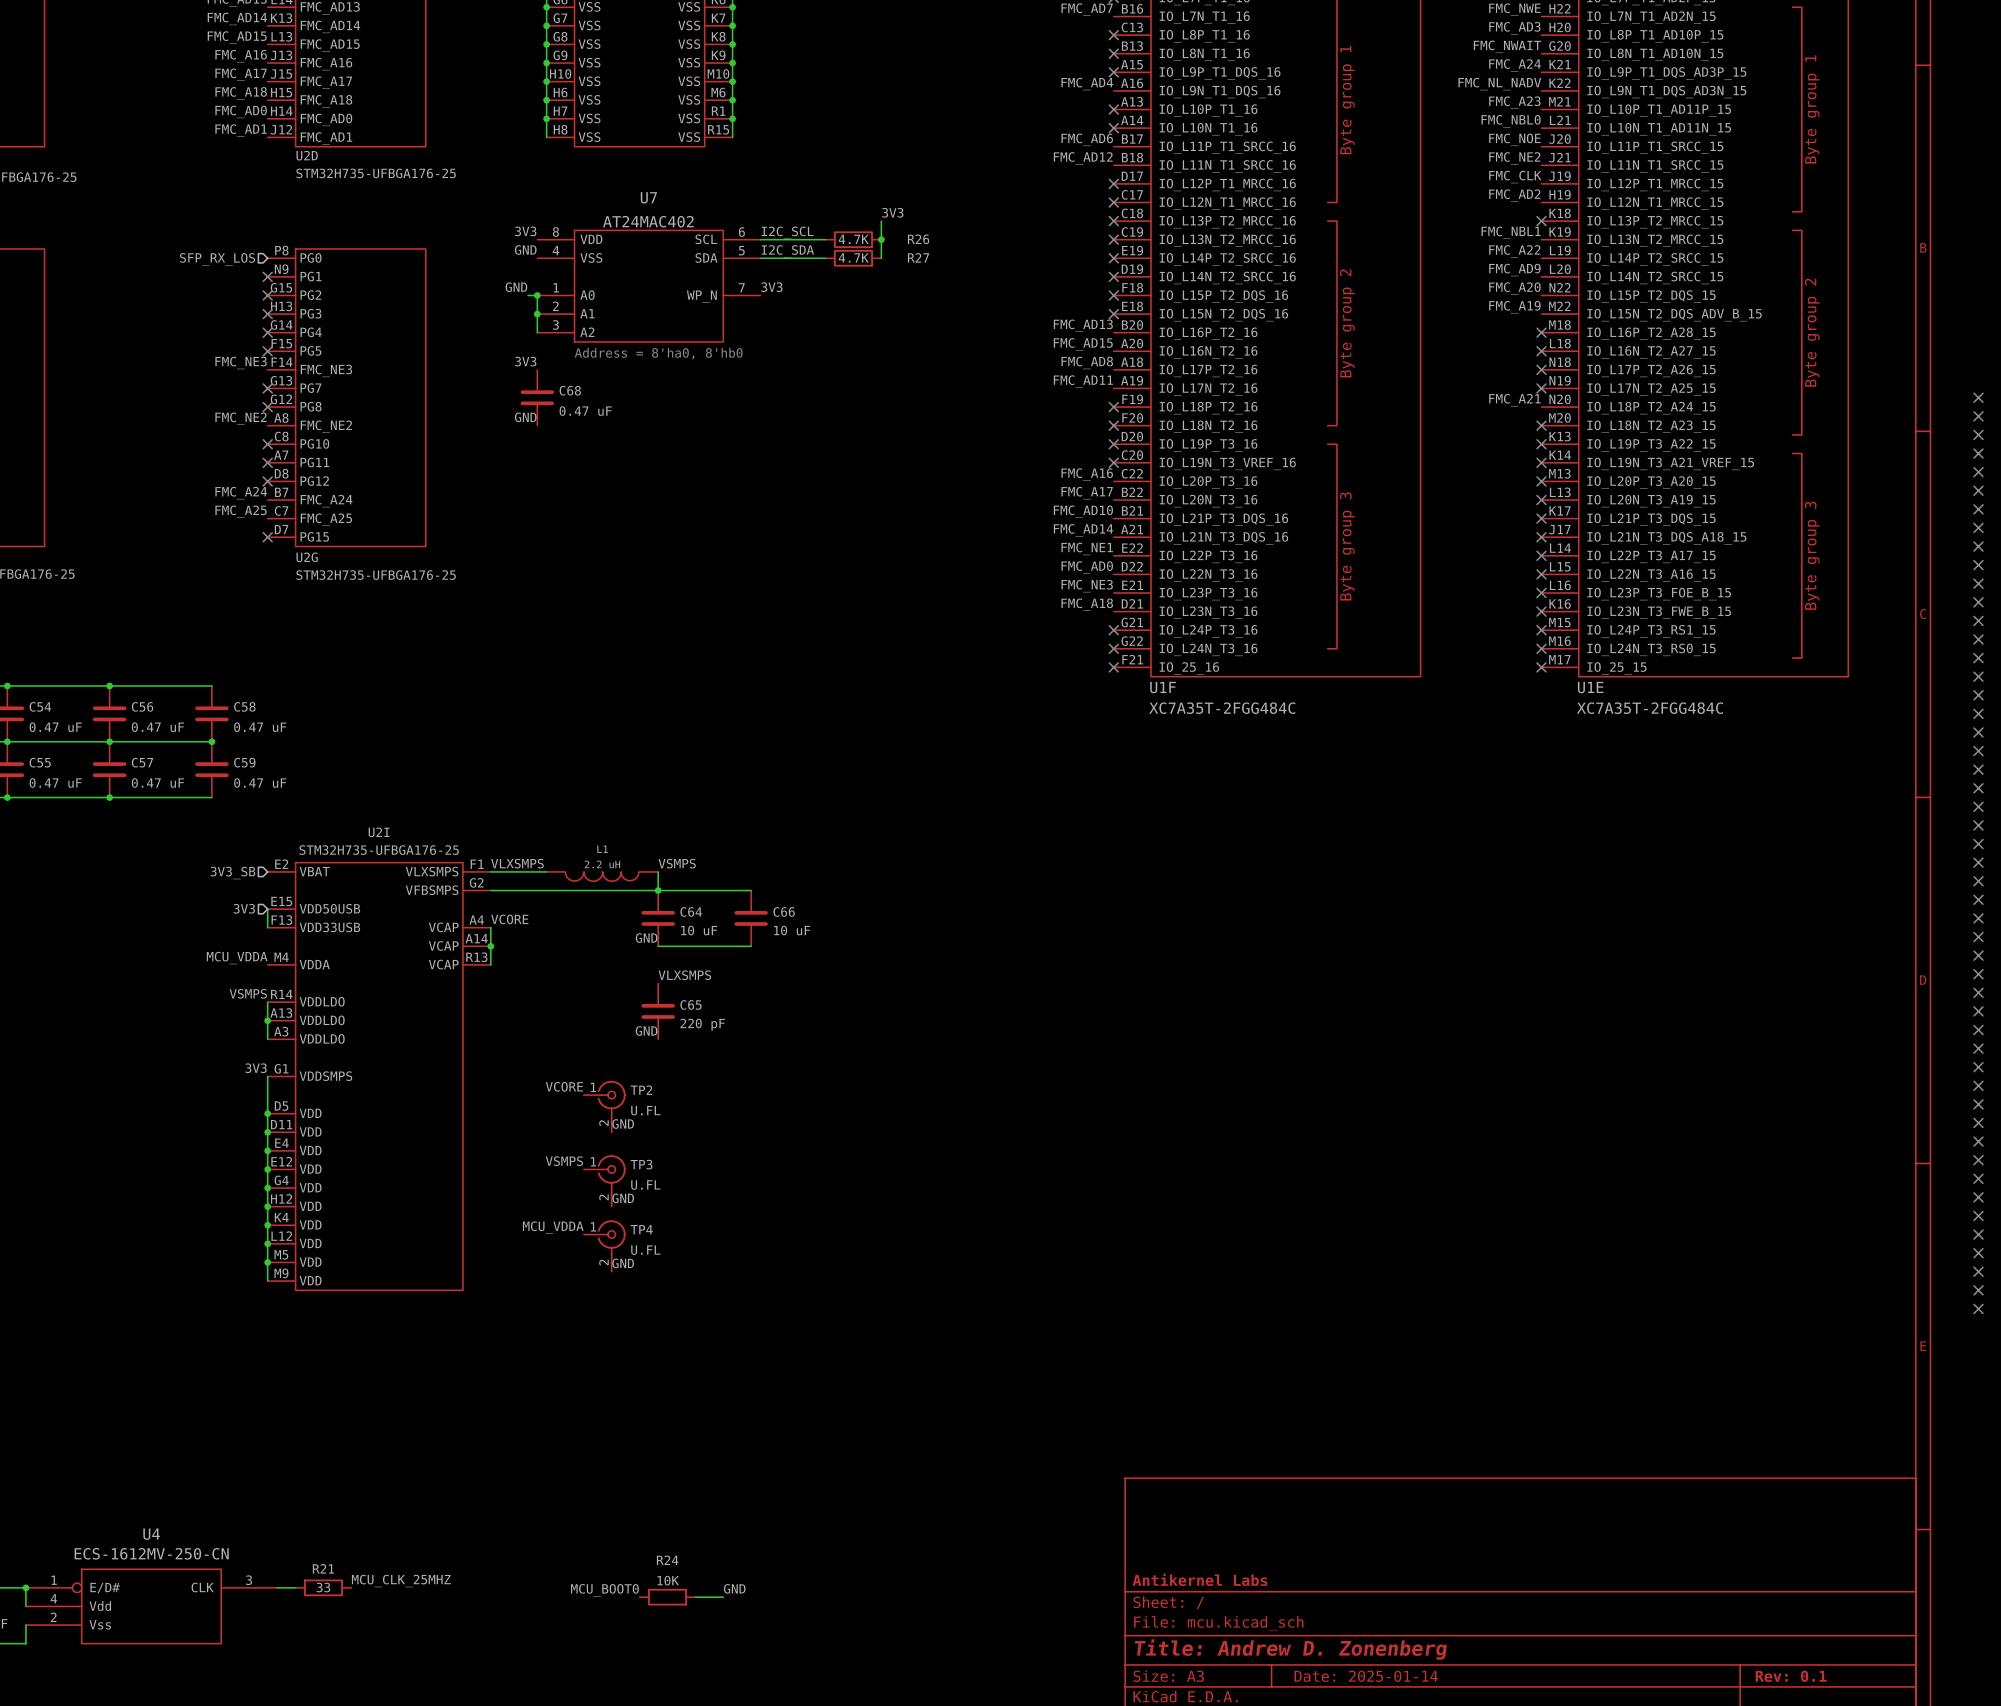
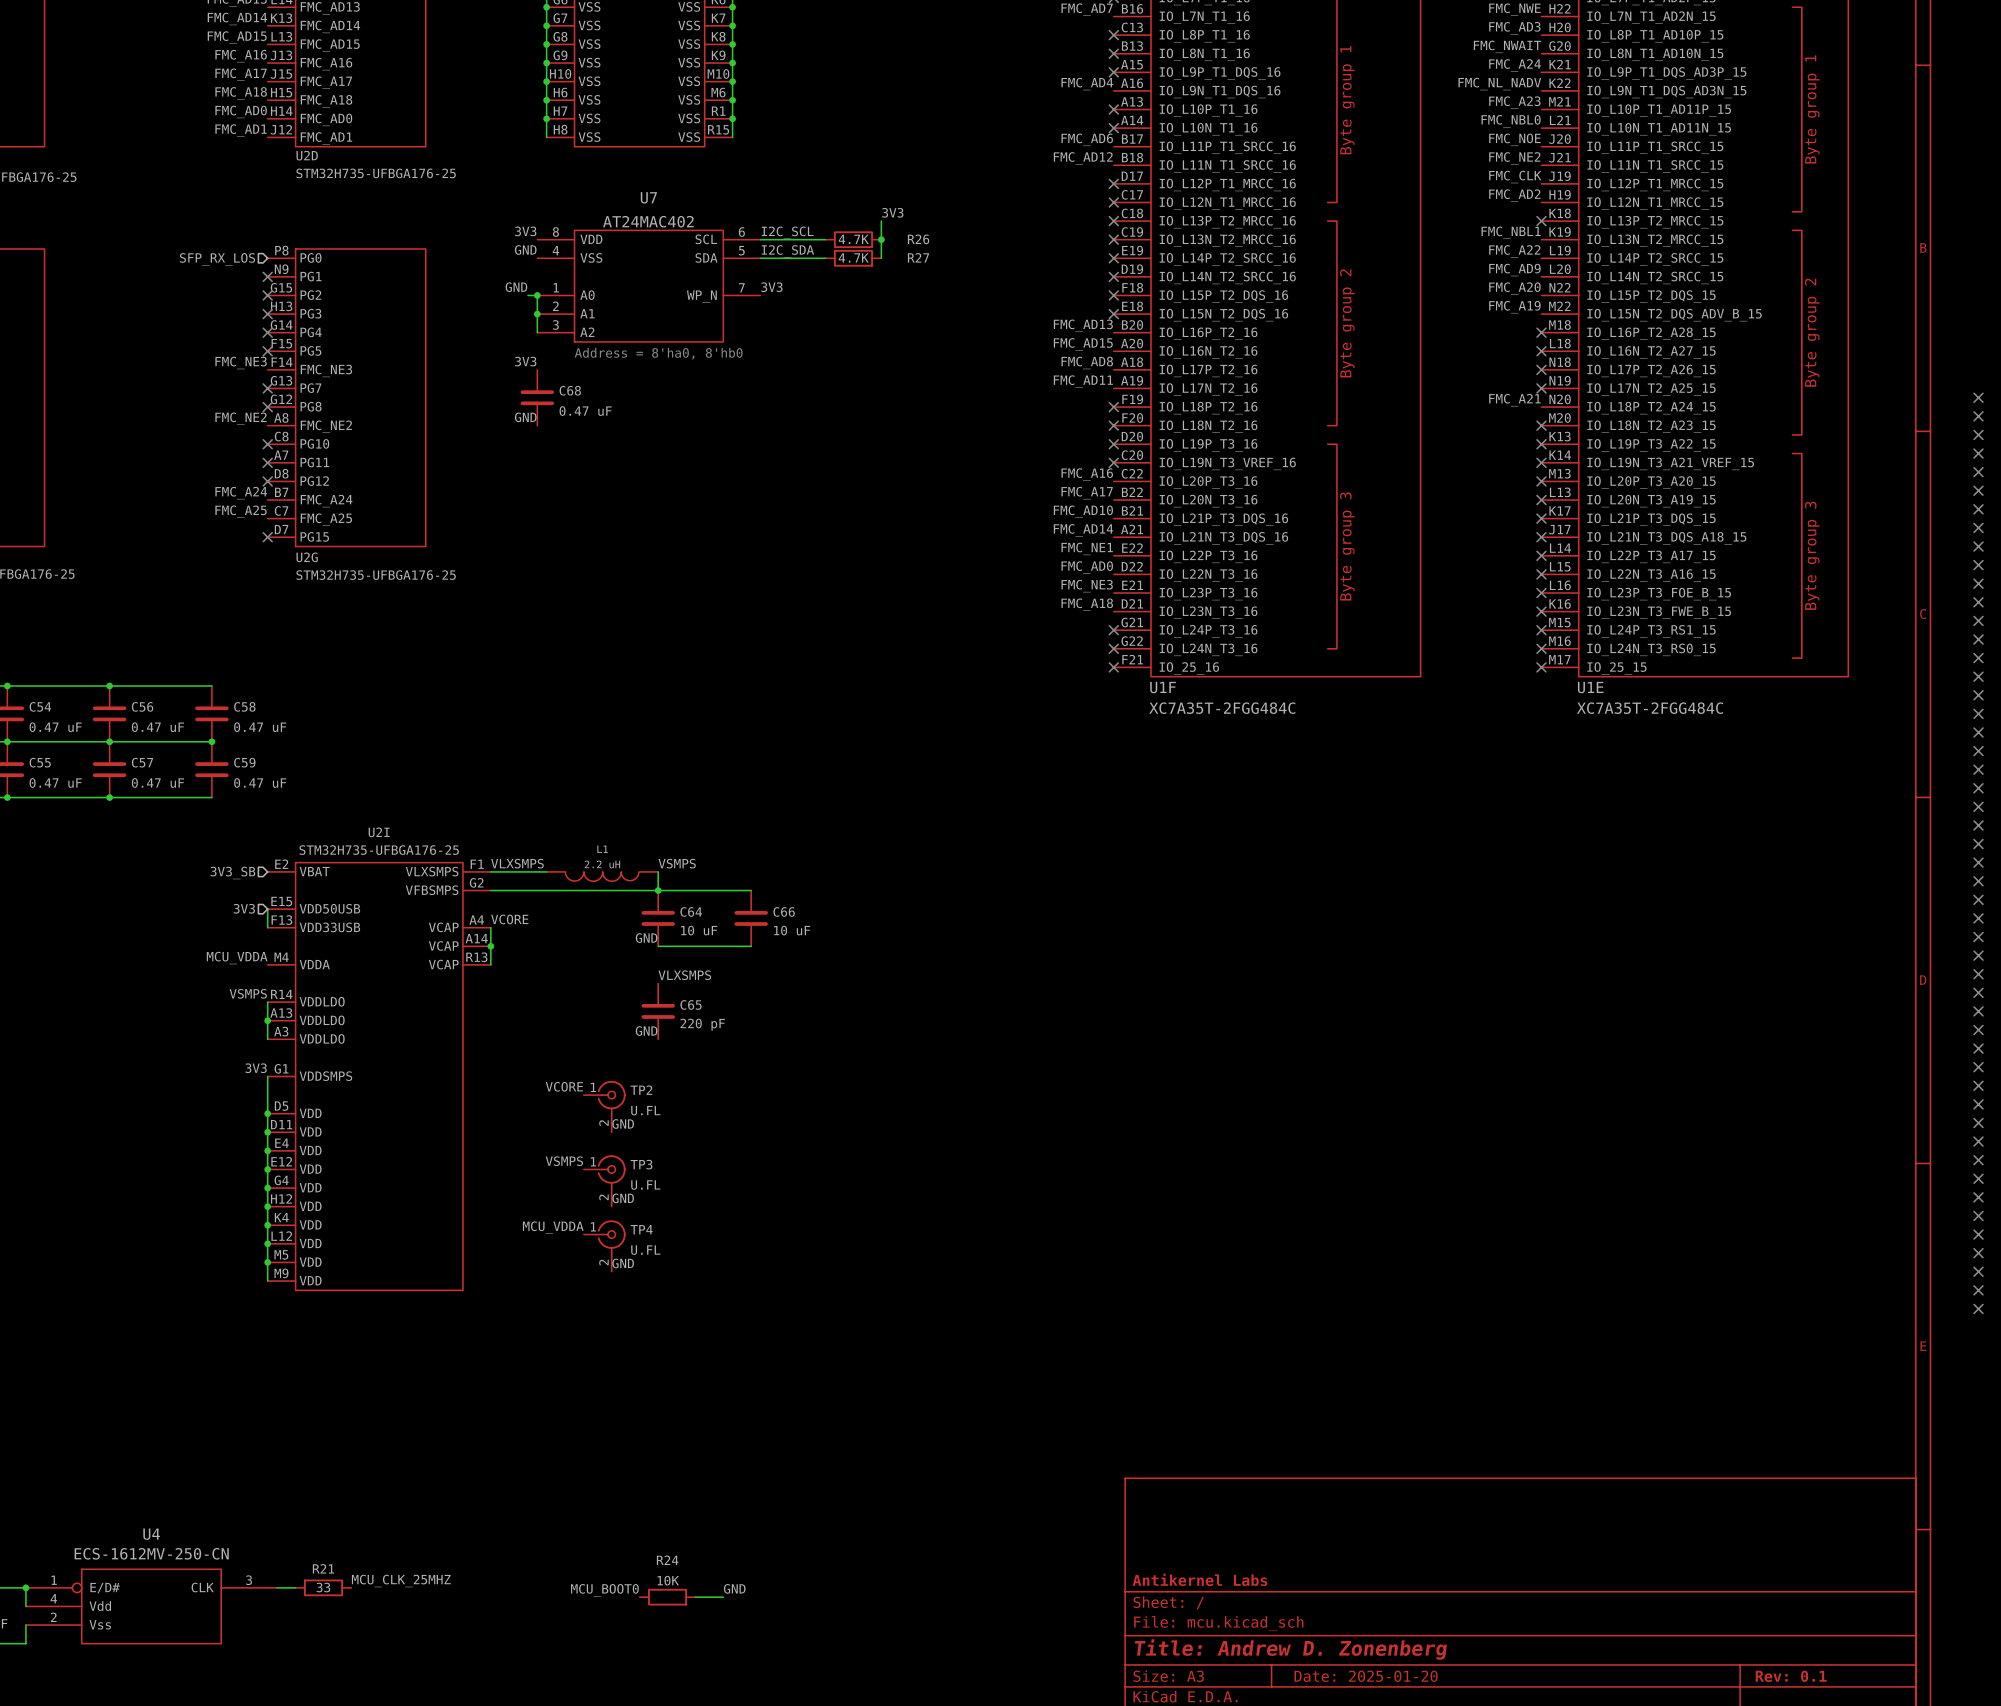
title block: Date: 2025-01-14 (1366, 1676) -> Date: 2025-01-20 (1366, 1676)

